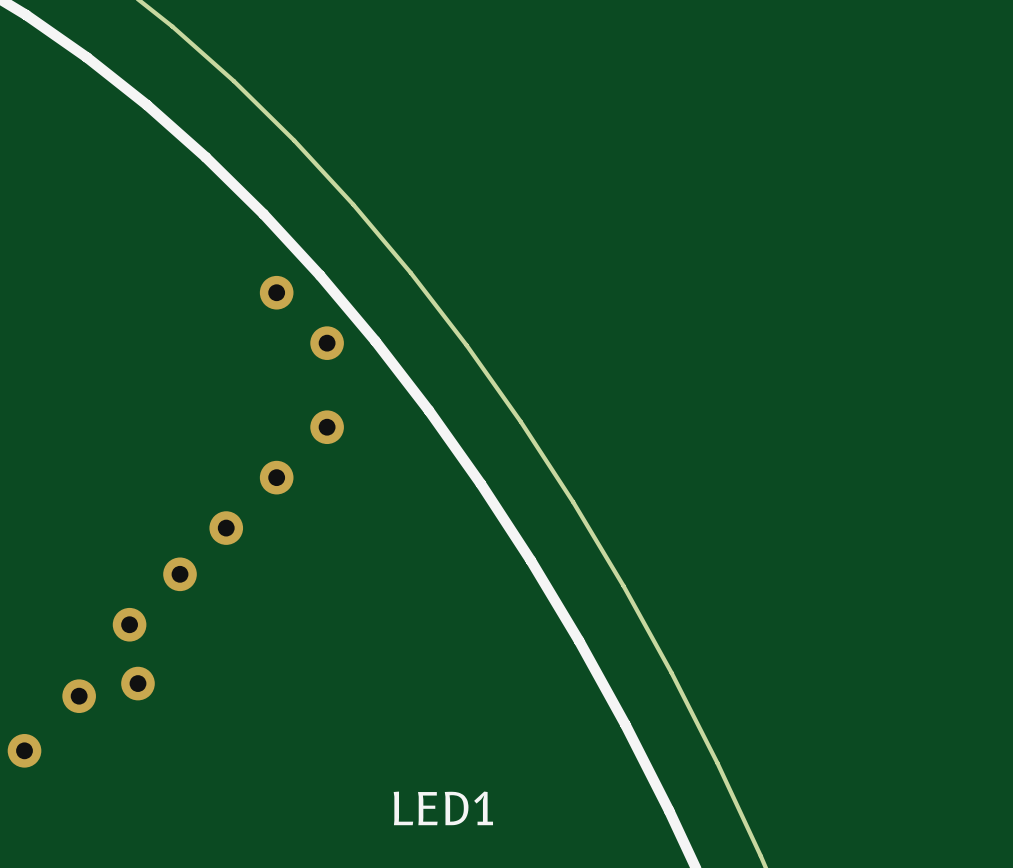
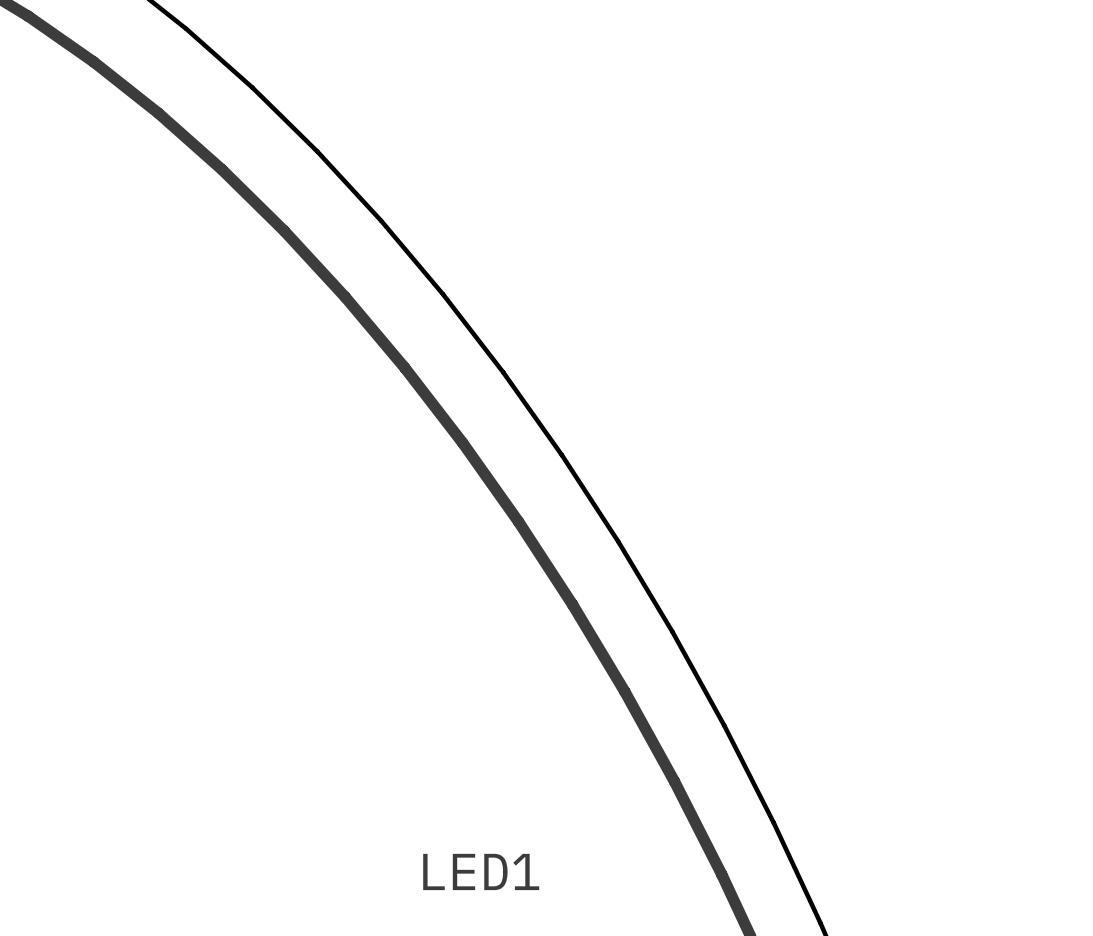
via: (276, 292) -> none
via: (327, 343) -> none
via: (327, 427) -> none
via: (276, 477) -> none
via: (226, 528) -> none
via: (180, 574) -> none
via: (129, 624) -> none
via: (137, 683) -> none
via: (79, 696) -> none
via: (24, 750) -> none

